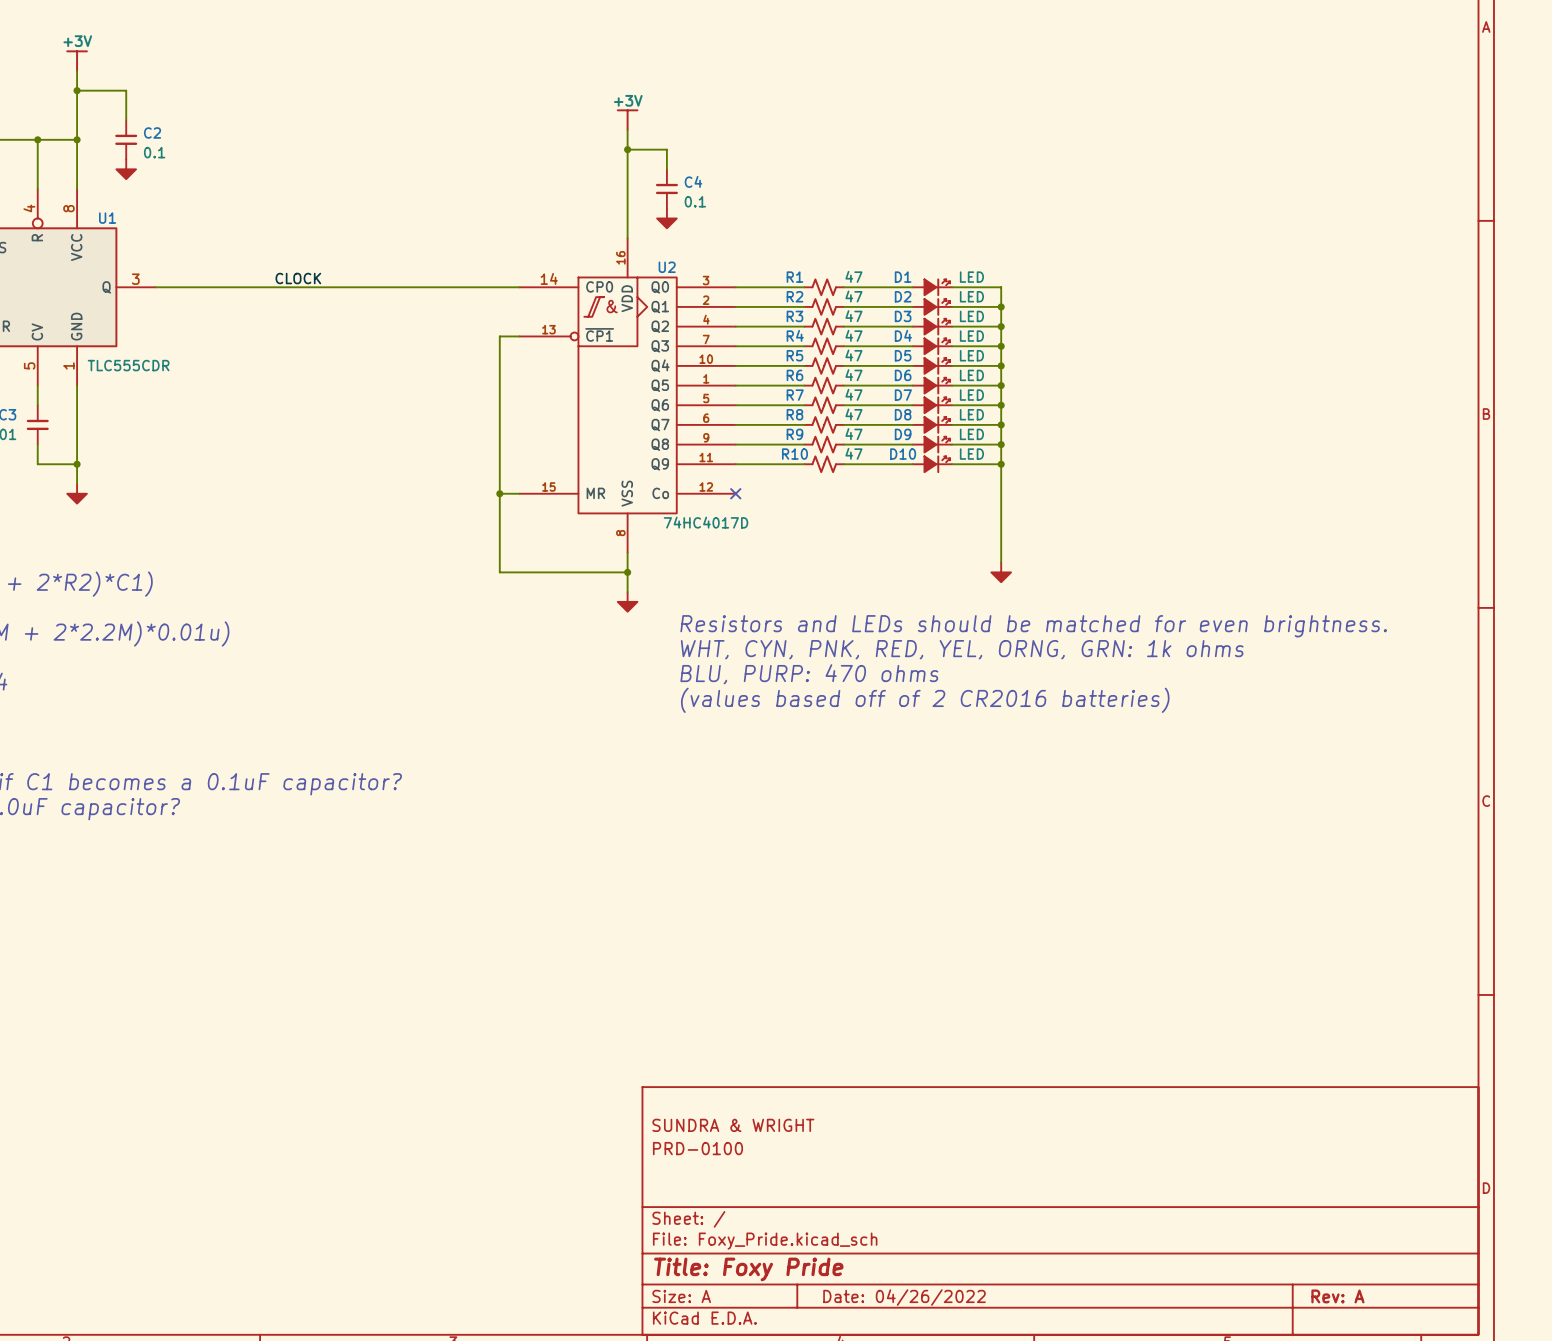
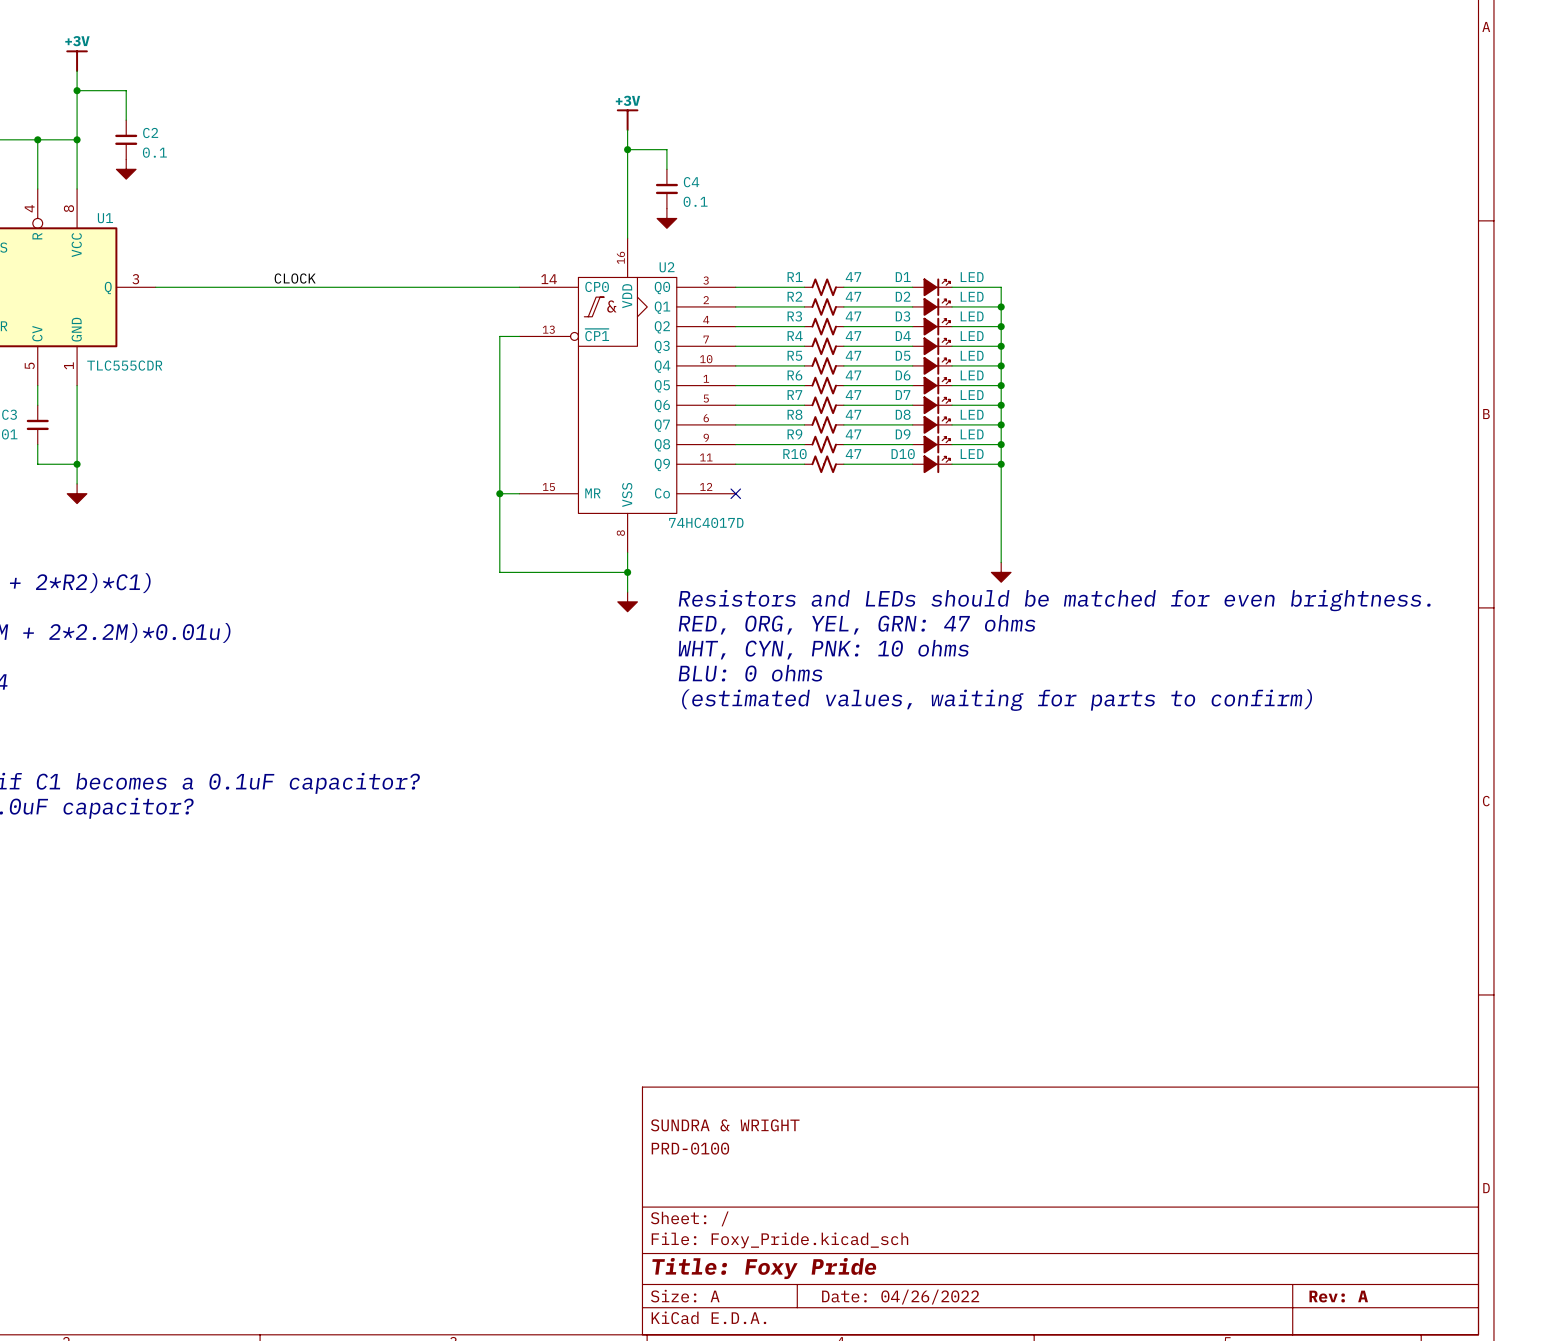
text: none -> Resistors and LEDs should be matched for even brightness. (1054, 600)
text: Resistors and LEDs should be matched for even brightness. (1033, 626) -> RED, ORG, YEL, GRN: 47 ohms (857, 624)
text: WHT, CYN, PNK, RED, YEL, ORNG, GRN: 1k ohms (962, 649) -> WHT, CYN, PNK: 10 ohms (823, 649)
text: BLU, PURP: 470 ohms (809, 674) -> BLU: 0 ohms (750, 673)
text: (values based off of 2 CR2016 batteries) (925, 700) -> (estimated values, waiting for parts to confirm) (997, 700)

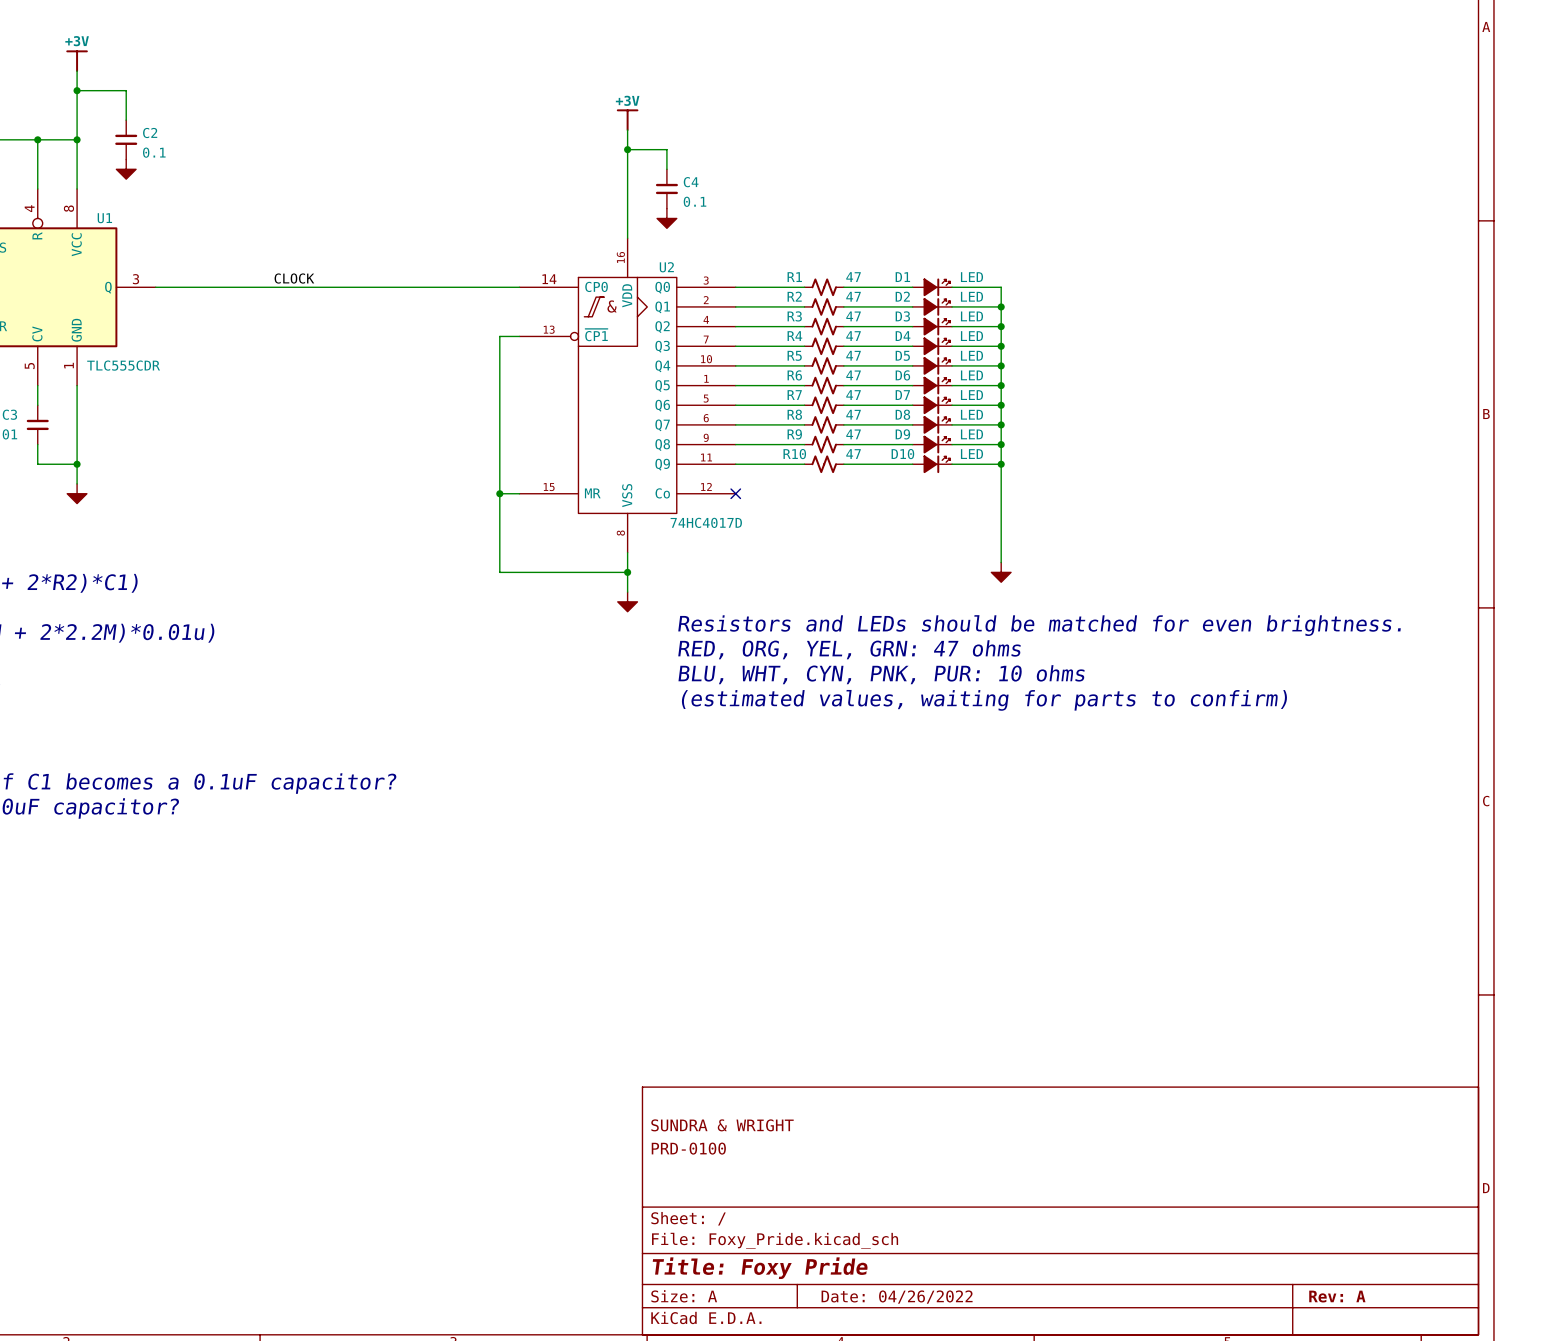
text: Resistors and LEDs should be matched for even brightness. (1054, 600) -> none
text: RED, ORG, YEL, GRN: 47 ohms (857, 624) -> Resistors and LEDs should be matched for even brightness. (1039, 625)
text: WHT, CYN, PNK: 10 ohms (823, 649) -> RED, ORG, YEL, GRN: 47 ohms (849, 649)
text: BLU: 0 ohms (750, 673) -> BLU, WHT, CYN, PNK, PUR: 10 ohms (881, 674)

